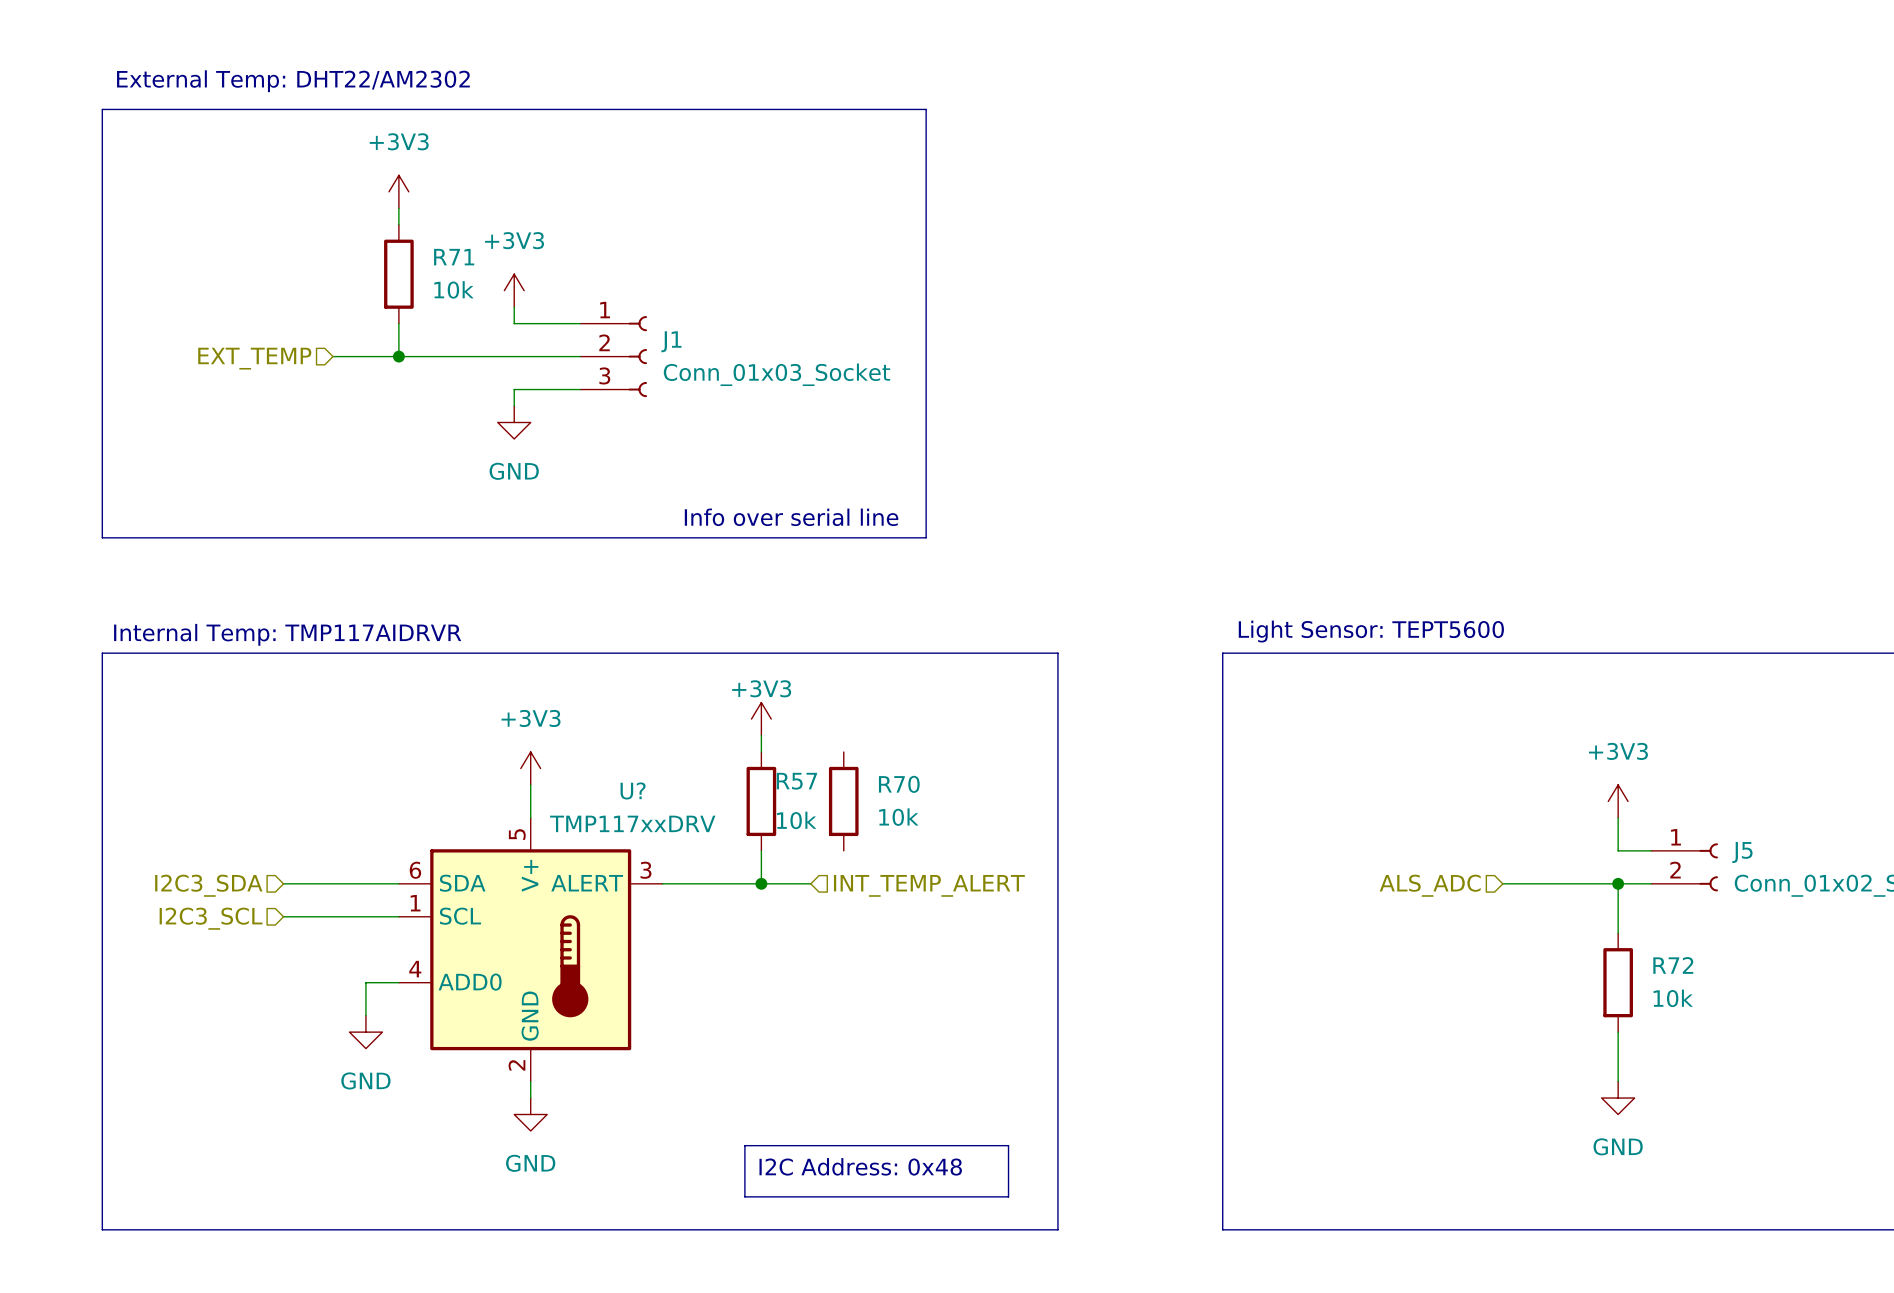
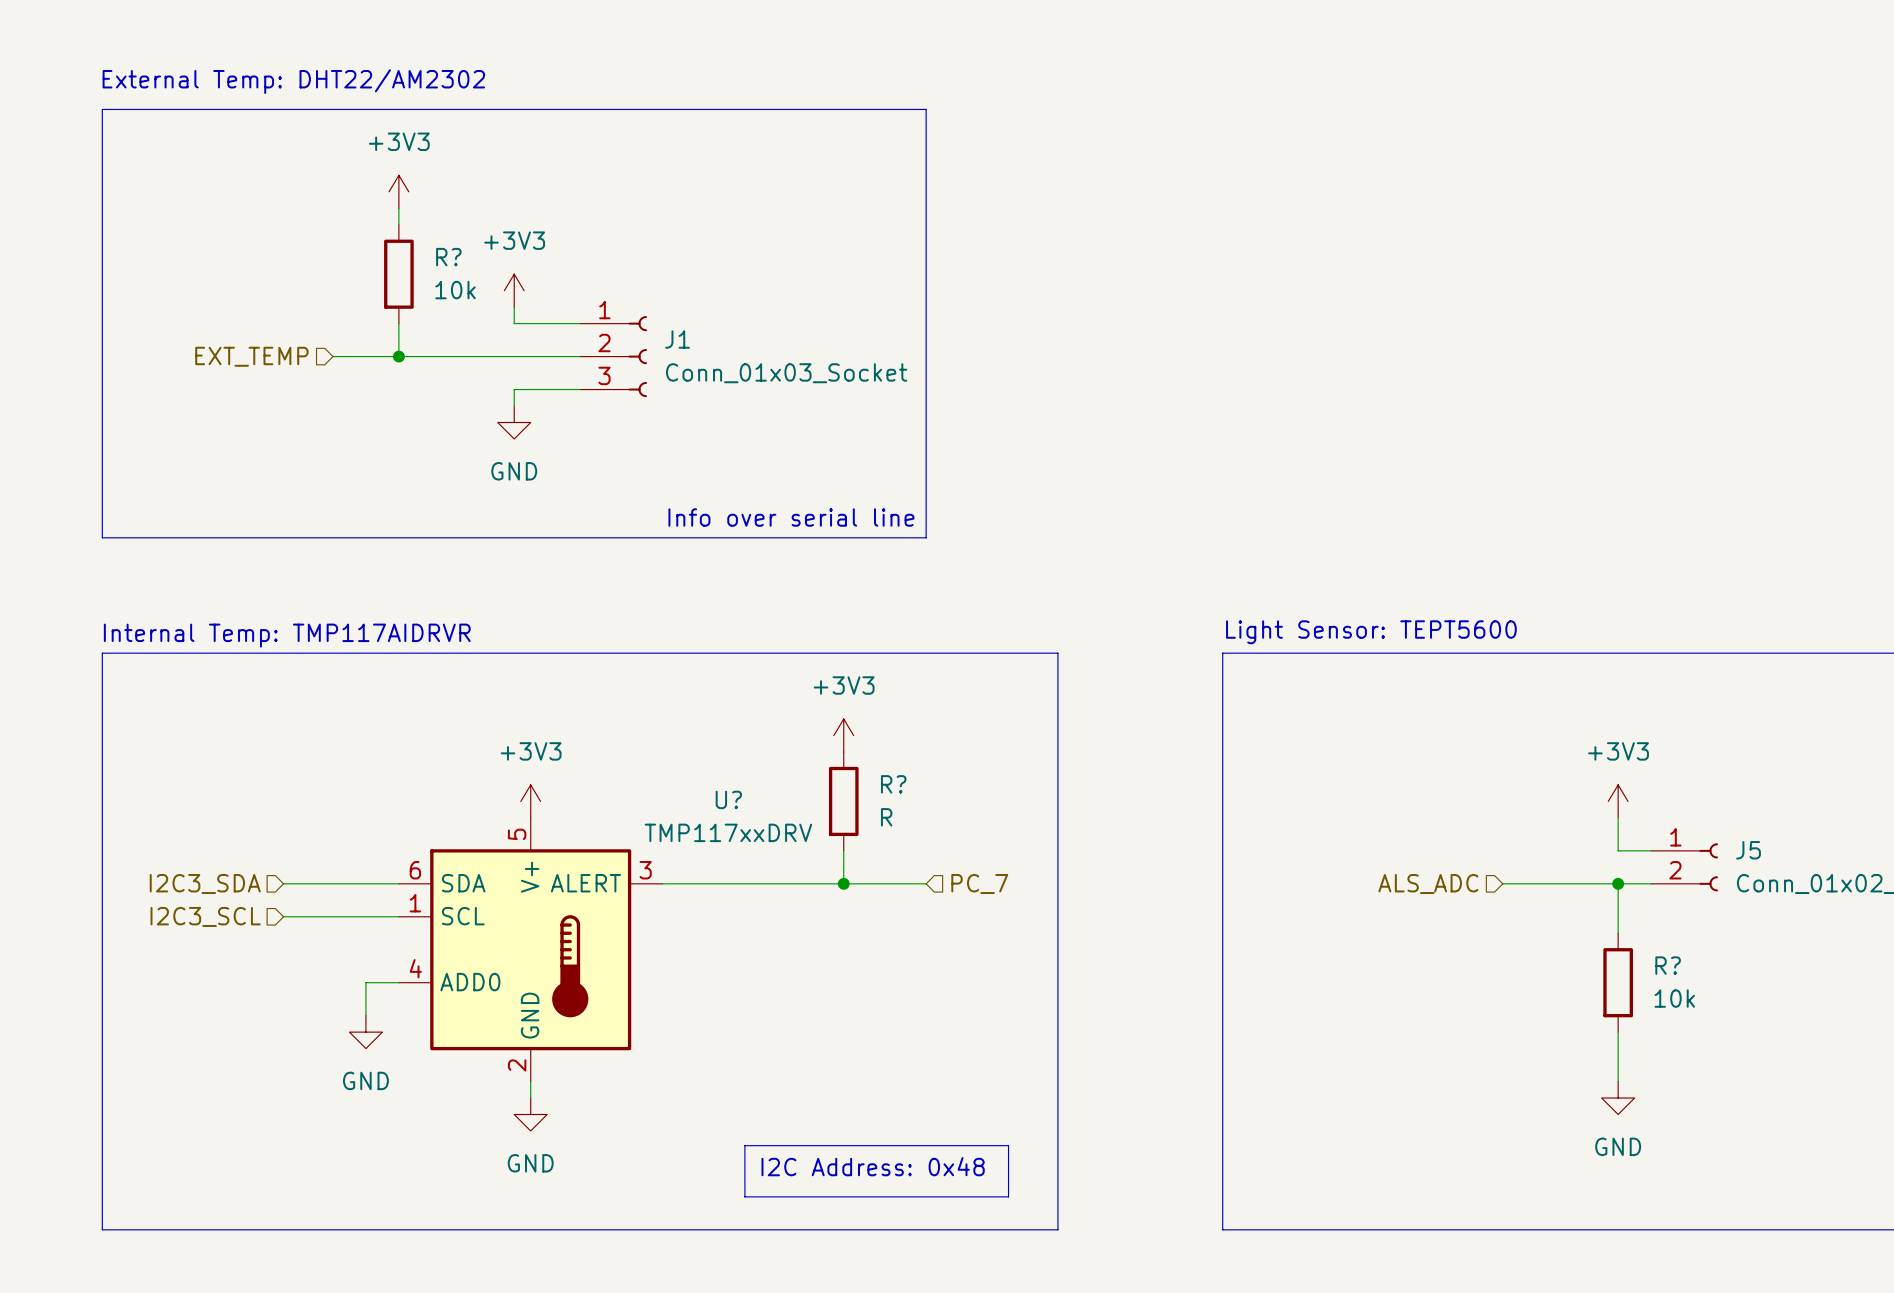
R71 name: R71 (454, 257) -> R? (448, 257)
power symbol text position: +3V3 (761, 688) -> +3V3 (844, 685)
power symbol position: +3V3 (761, 719) -> +3V3 (843, 735)
wire: (761, 735) (761, 752) -> none
power symbol position: +3V3 (530, 768) -> +3V3 (530, 801)
R70 name: R70 (899, 784) -> R? (893, 784)
U? name position: U? (633, 790) -> U? (728, 799)
R57: 10k (761, 801) -> none
R70 value: 10k (898, 817) -> R (886, 817)
U? value position: TMP117xxDRV (632, 823) -> TMP117xxDRV (728, 832)
wire: (761, 850) (761, 883) -> (843, 850) (843, 883)
junction: (761, 883) -> none
wire: none -> (810, 883) (926, 883)
junction: none -> (843, 883)
hierarchical label: INT_TEMP_ALERT (929, 885) -> none
hierarchical label: none -> PC_7 (979, 884)
R72 name: R72 (1673, 965) -> R? (1668, 965)

